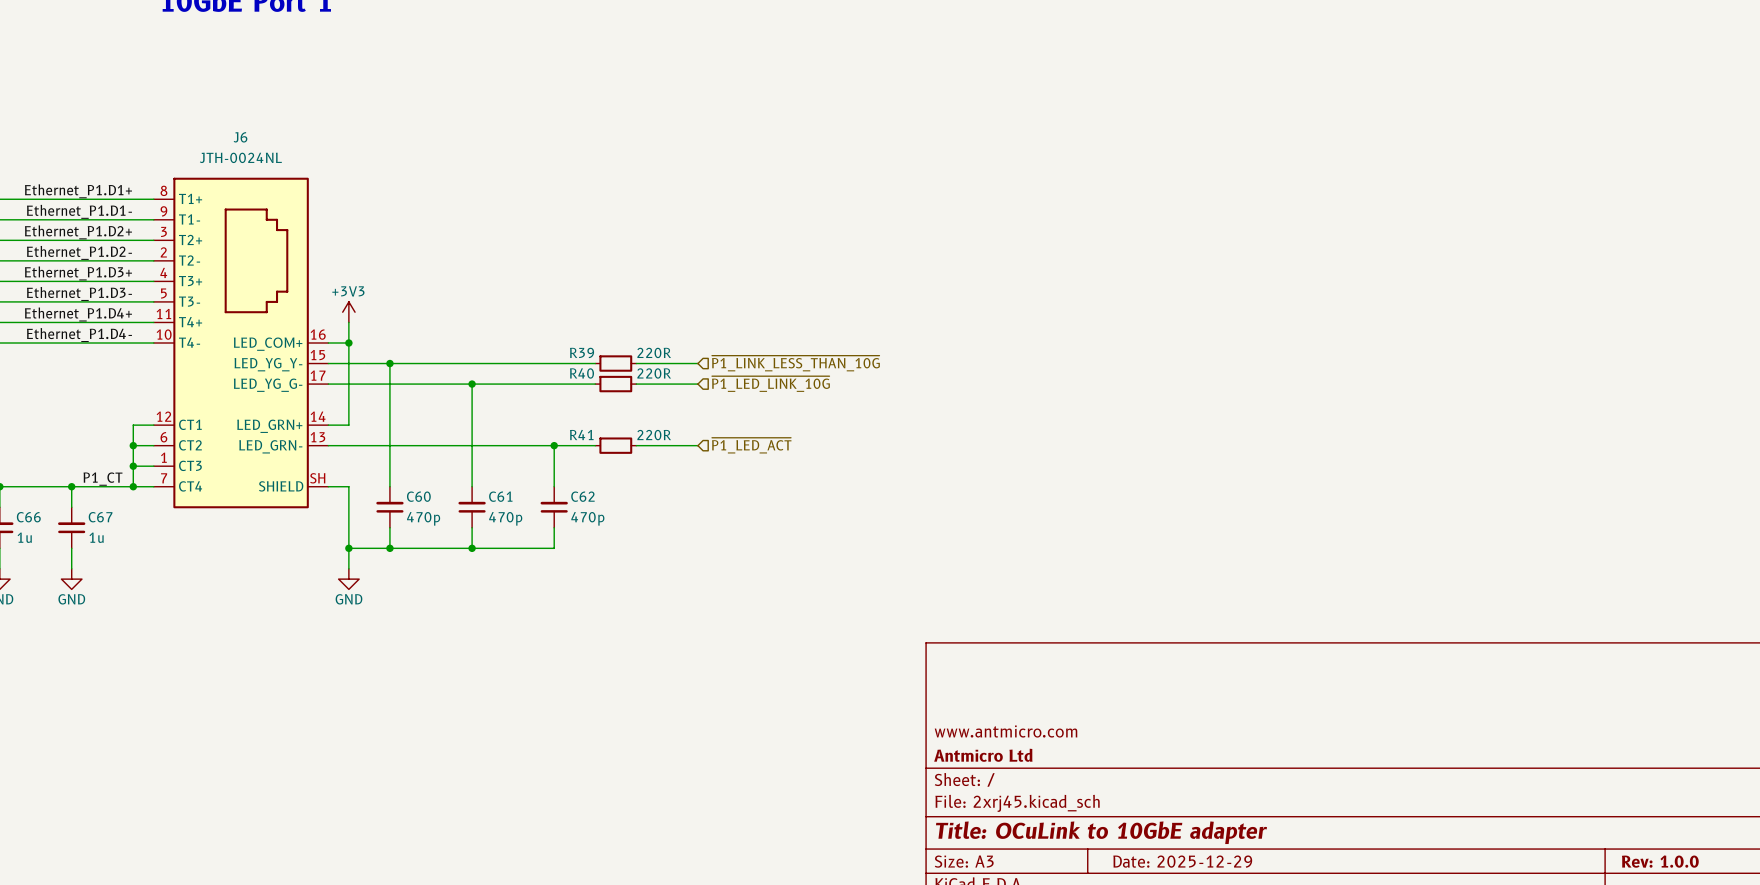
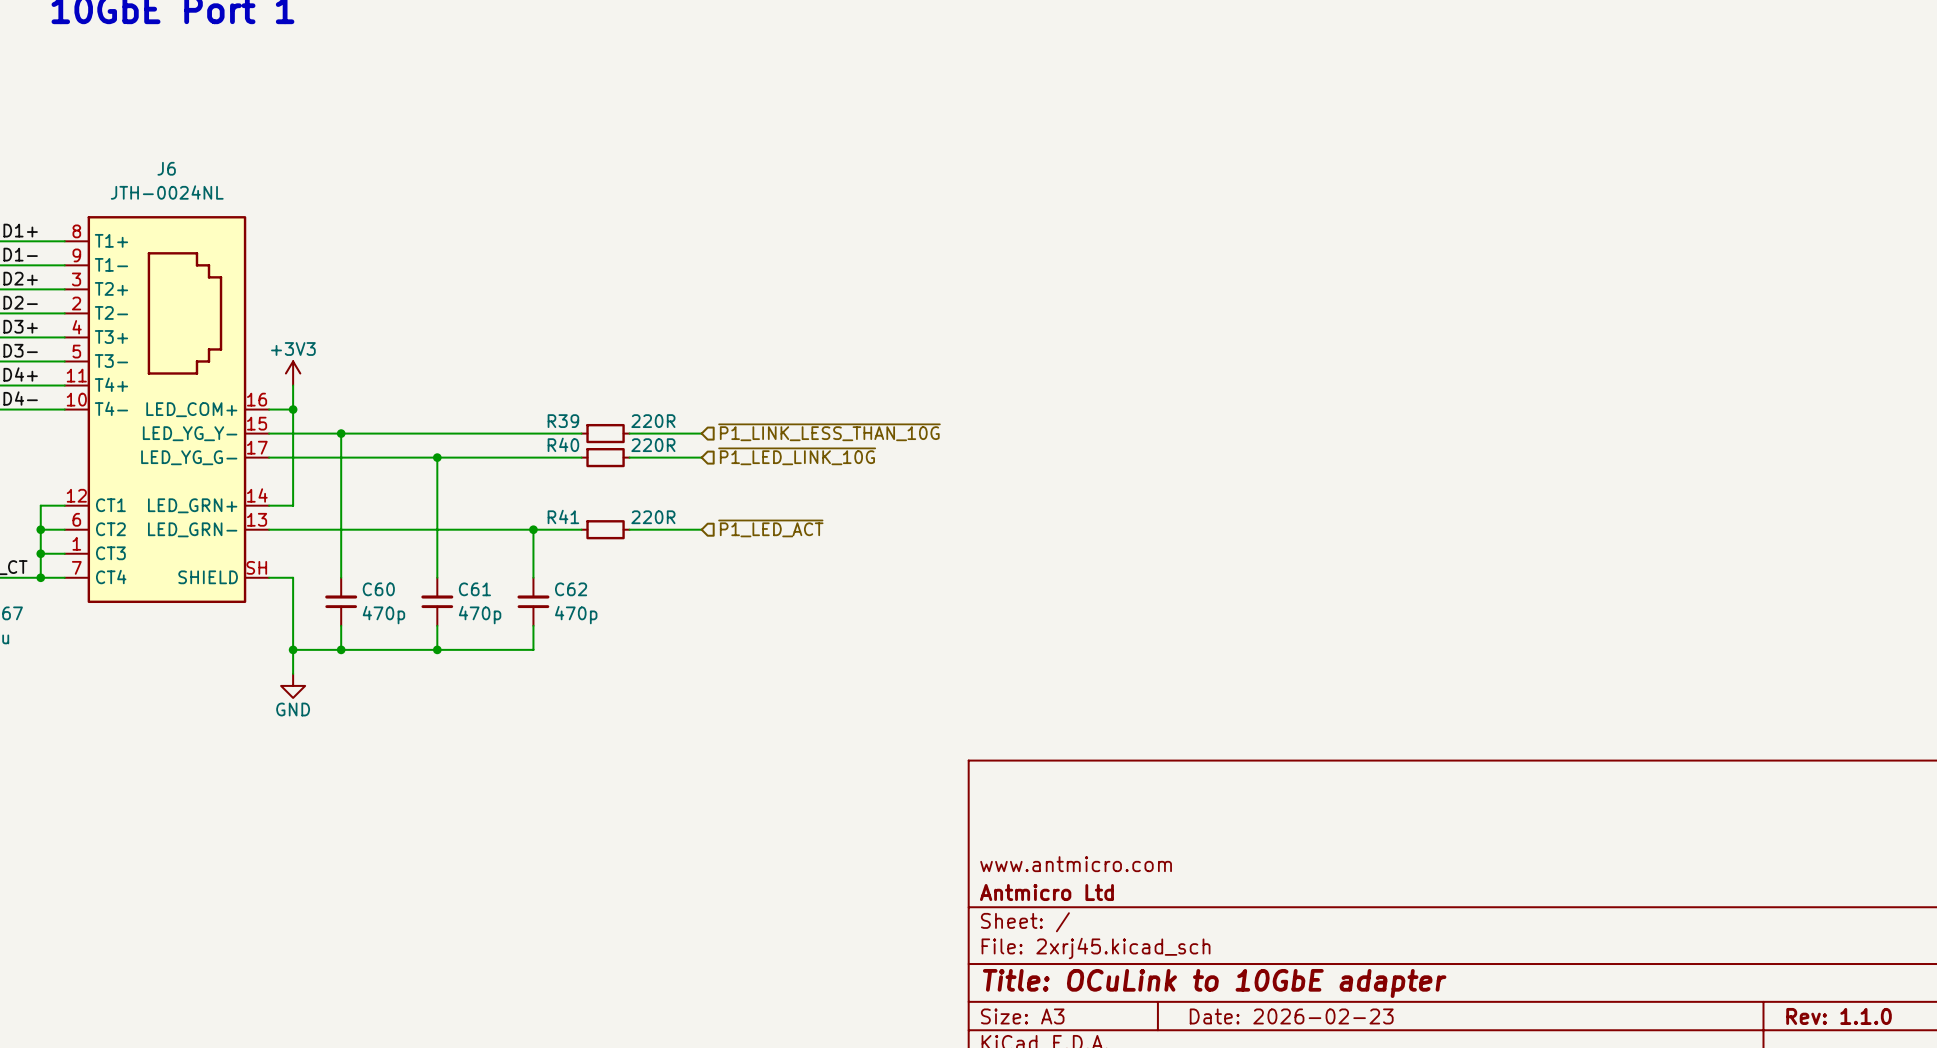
title block: Date: 2025-12-29 (1182, 861) -> Date: 2026-02-23 (1291, 1016)
title block: Rev: 1.0.0 (1660, 861) -> Rev: 1.1.0 (1839, 1016)

